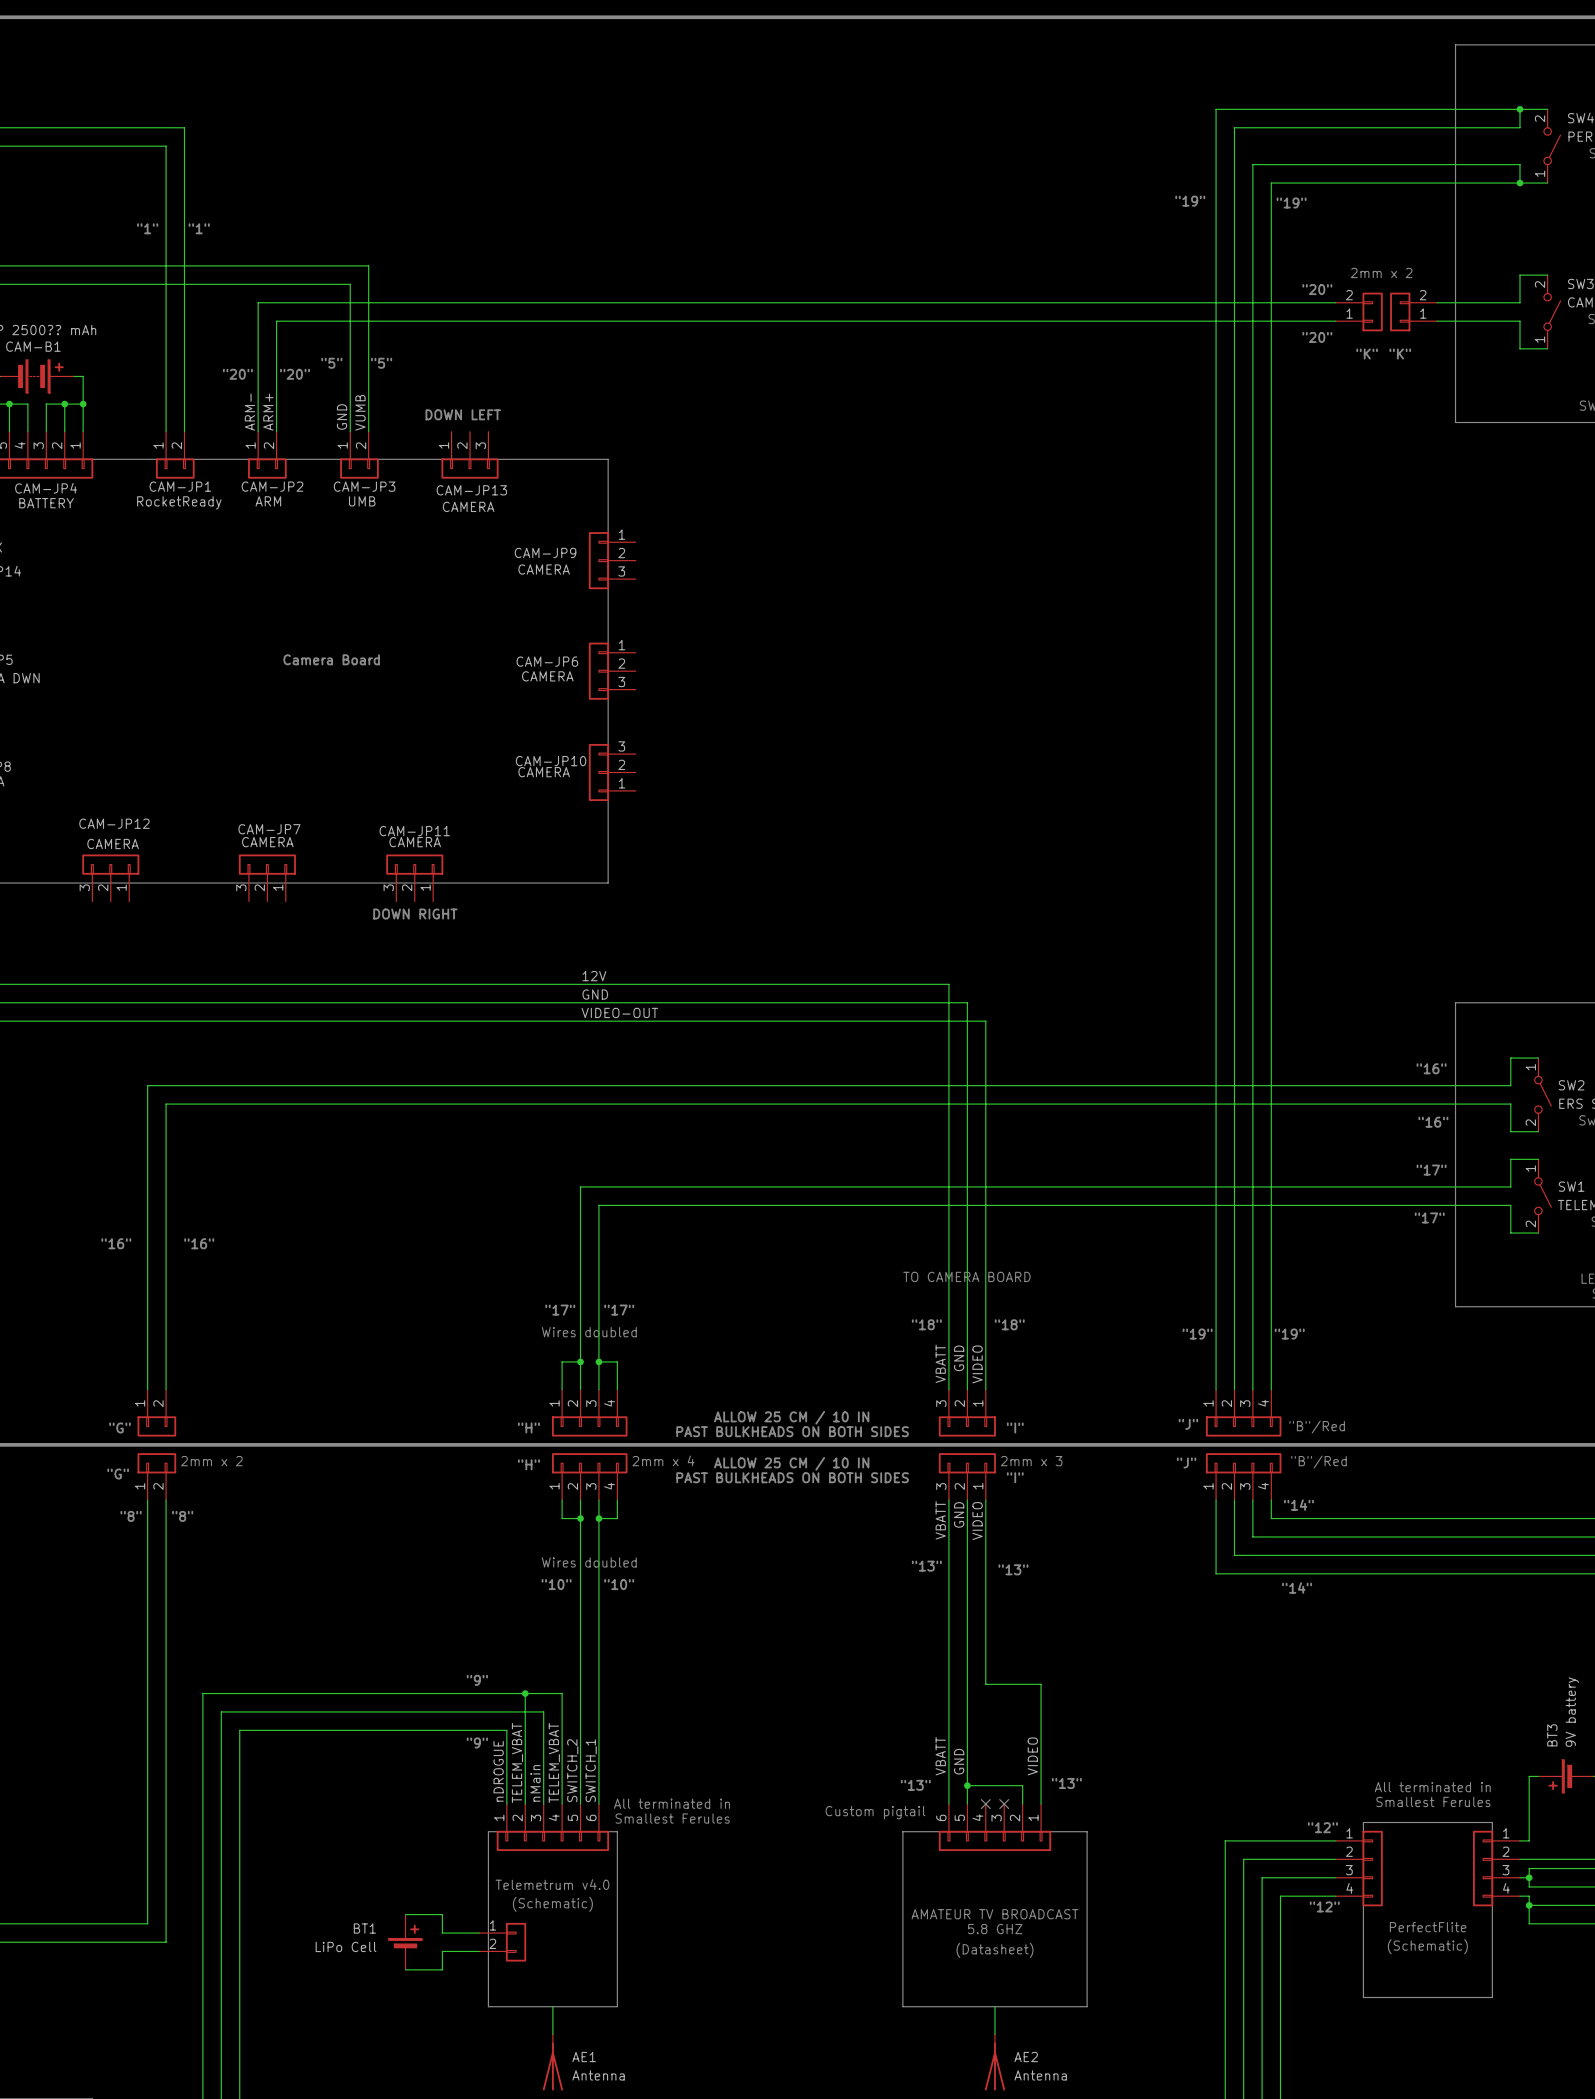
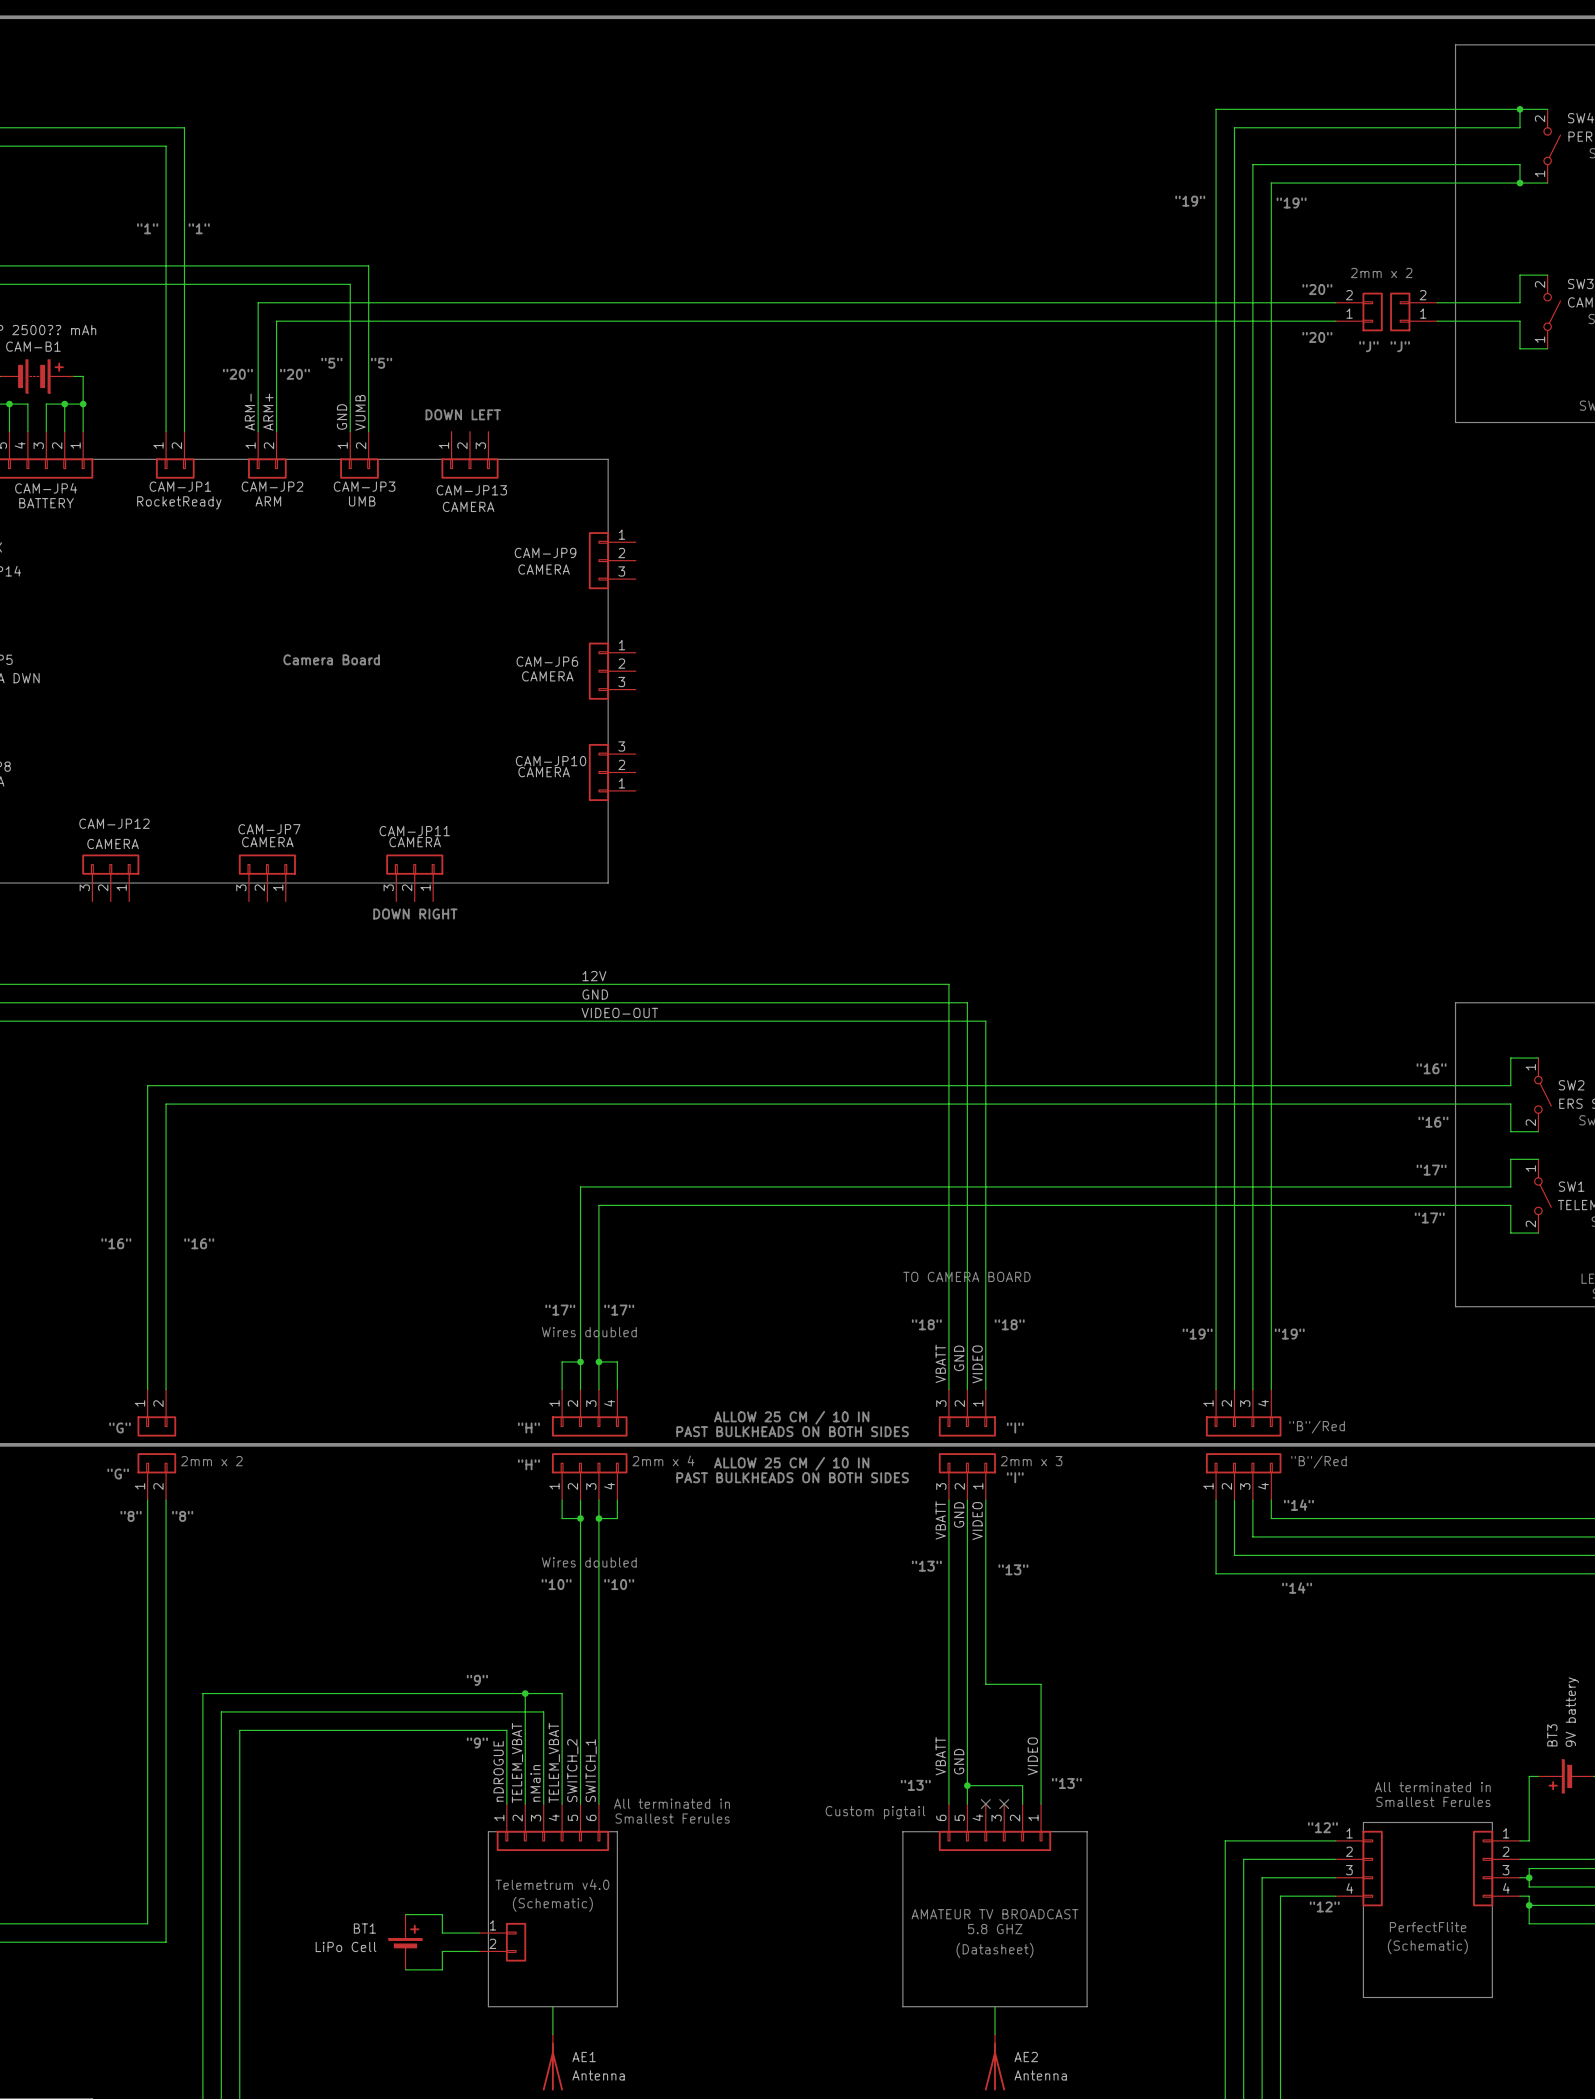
text: "K" (1367, 354) -> "J" (1368, 346)
text: "K" (1400, 354) -> "J" (1400, 346)
text: "J" (1188, 1424) -> none
text: "J" (1186, 1462) -> none

